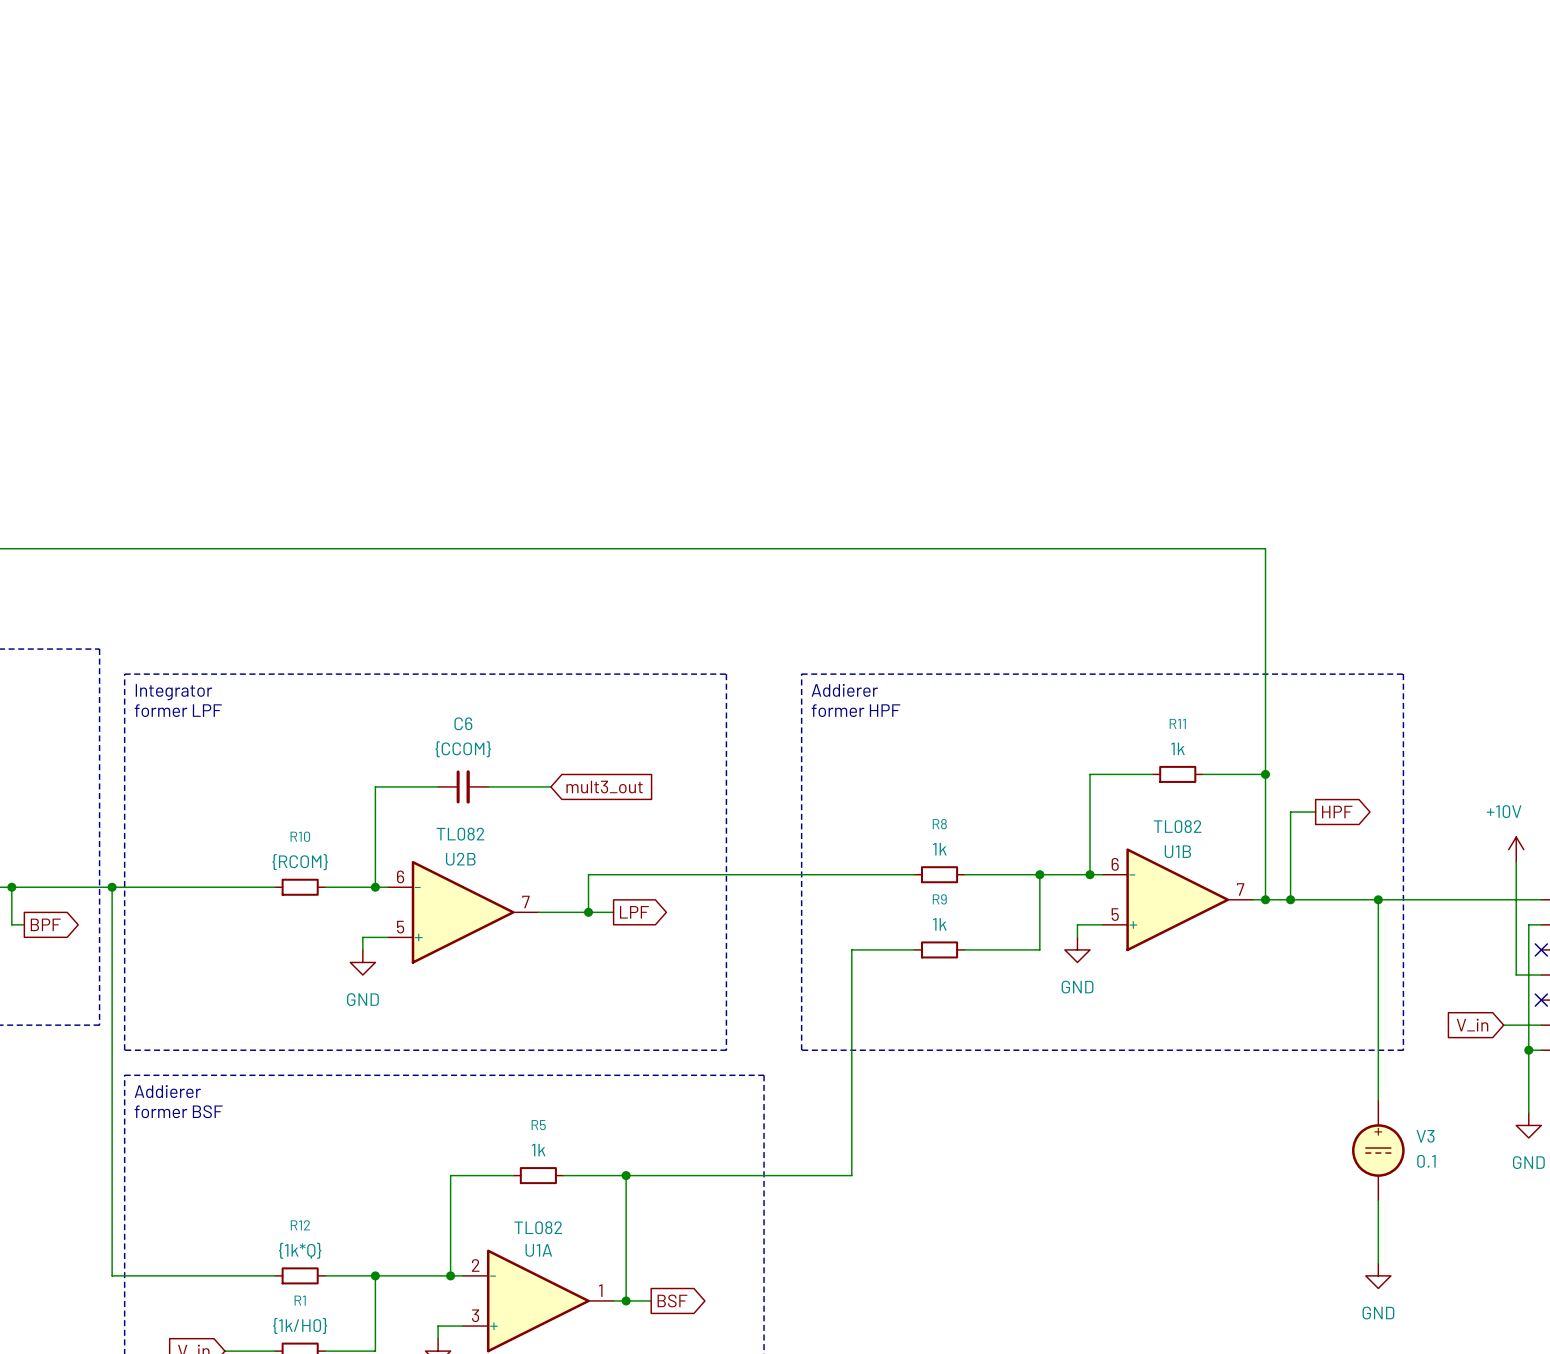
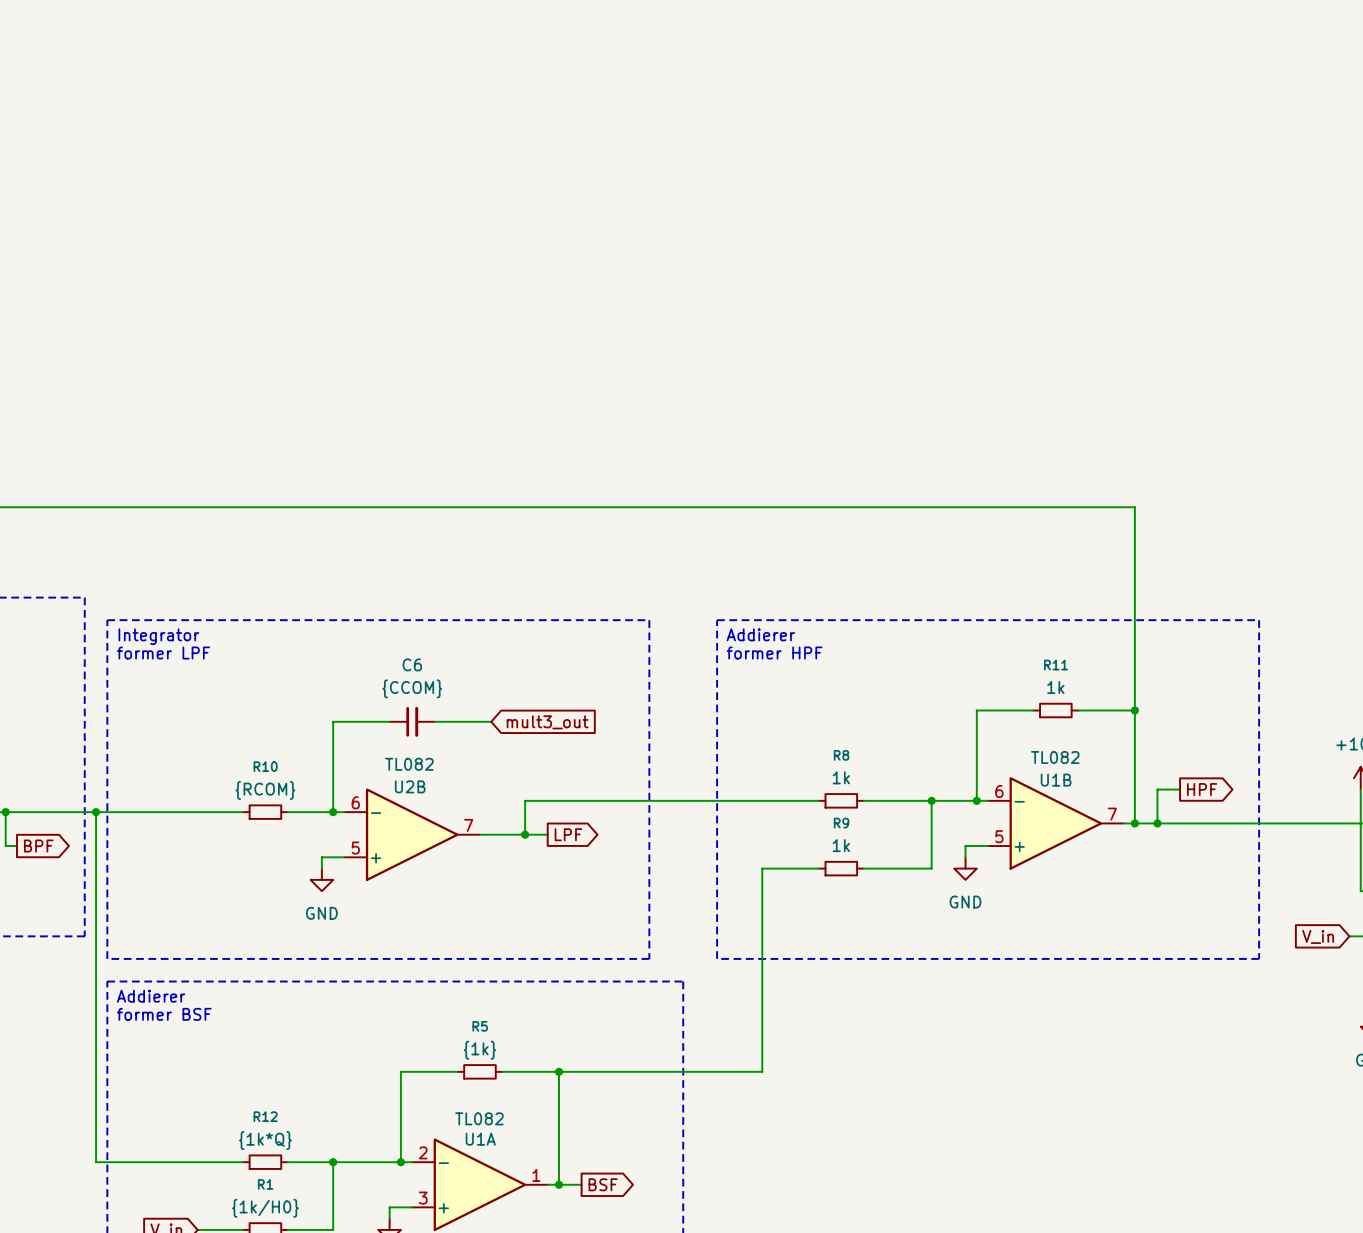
wire: (1315, 812) (1290, 812) (1290, 862) -> (1180, 789) (1157, 789)
global label position: HPF (1337, 812) -> HPF (1202, 789)
wire: (1378, 899) (1378, 1100) -> none
junction: (1378, 899) -> none
R5 value: 1k (538, 1150) -> {1k} (479, 1050)
V3: 0.1 (1378, 1150) -> none
wire: (1378, 1200) (1378, 1263) -> none
power symbol: GND (1378, 1275) -> none

